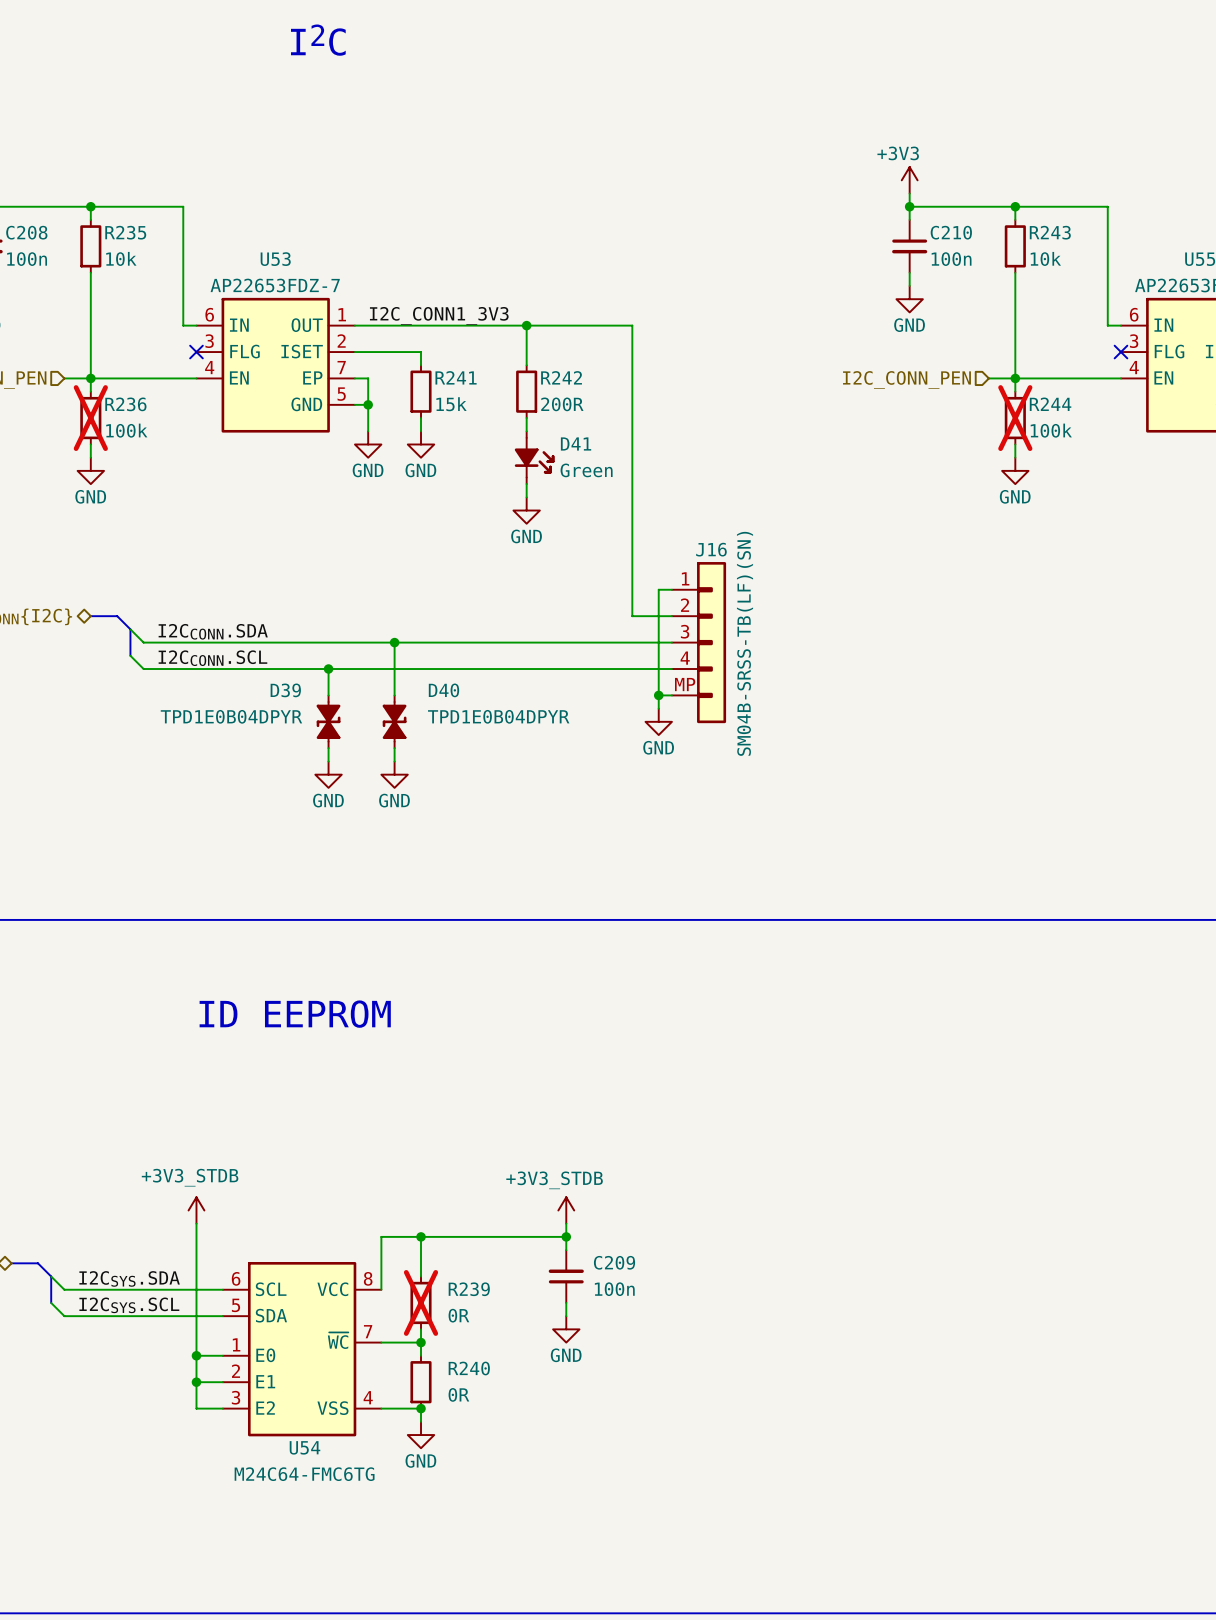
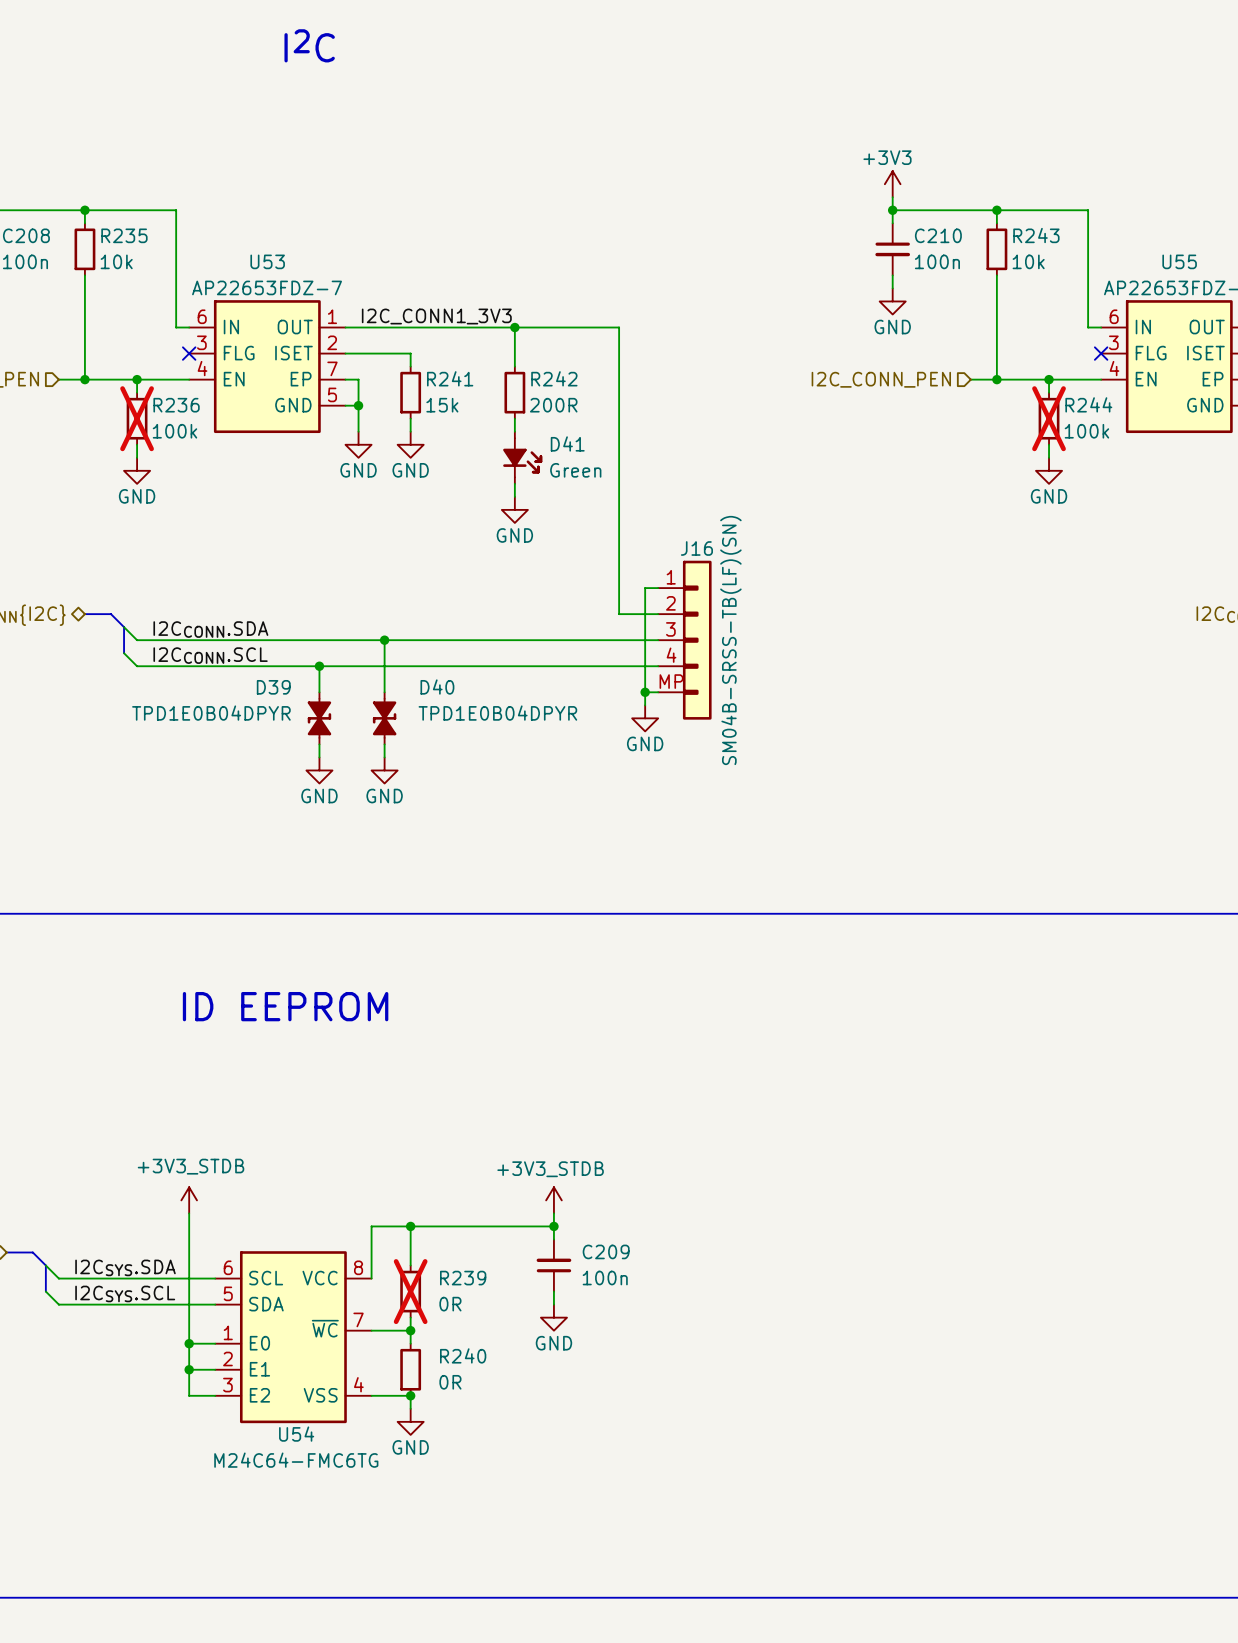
wire: (90, 378) (90, 391) -> (137, 379) (137, 392)
junction: none -> (137, 379)
wire: (1015, 378) (1015, 391) -> (1049, 379) (1049, 392)
junction: none -> (1049, 379)
R236 position: (90, 418) -> (137, 418)
R244 position: (1015, 418) -> (1049, 418)
wire: (90, 444) (90, 457) -> (137, 444) (137, 457)
wire: (1015, 444) (1015, 457) -> (1049, 444) (1049, 457)
power symbol position: GND (90, 470) -> GND (137, 470)
power symbol position: GND (1015, 470) -> GND (1049, 470)

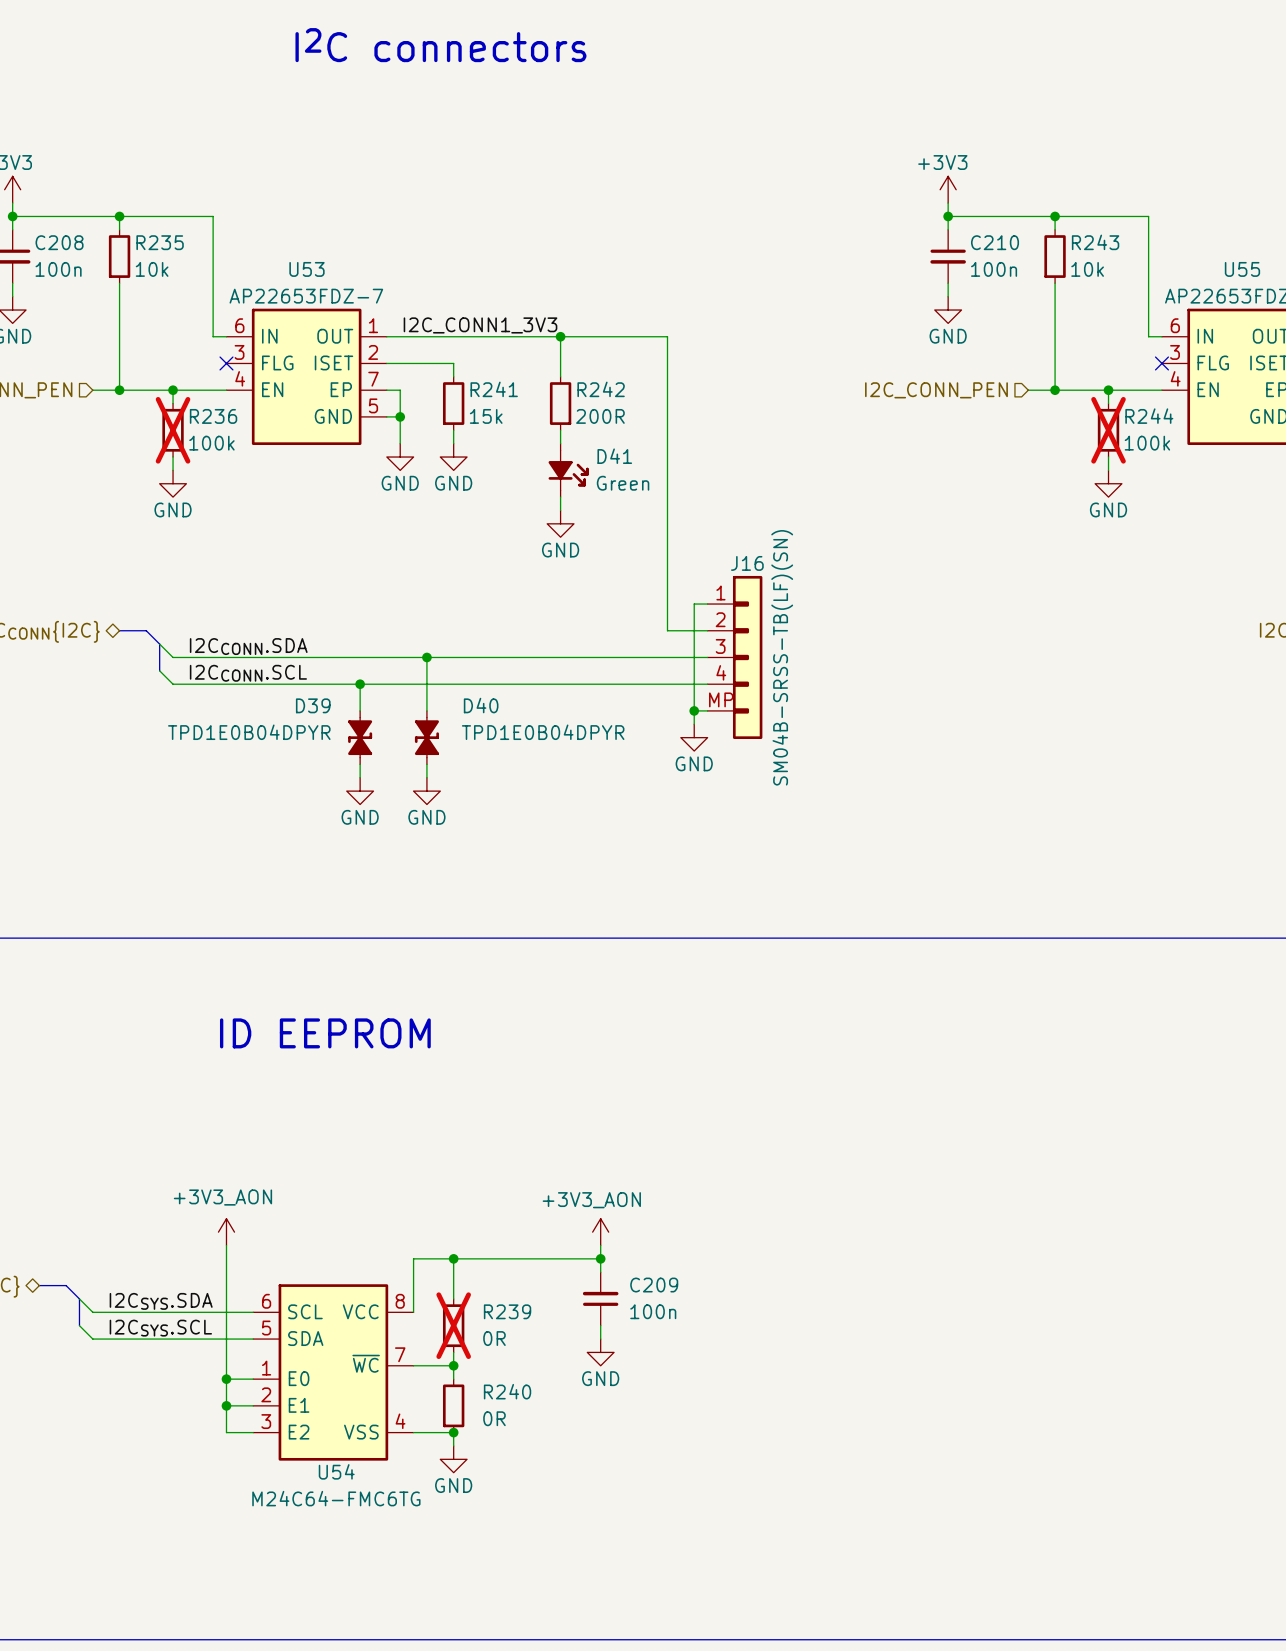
text: none -> I2C connectors (440, 45)
text: I2C (309, 45) -> none
power symbol: +3V3_STDB (189, 1200) -> +3V3_AON (226, 1232)
power symbol: +3V3_STDB (553, 1200) -> +3V3_AON (600, 1232)

